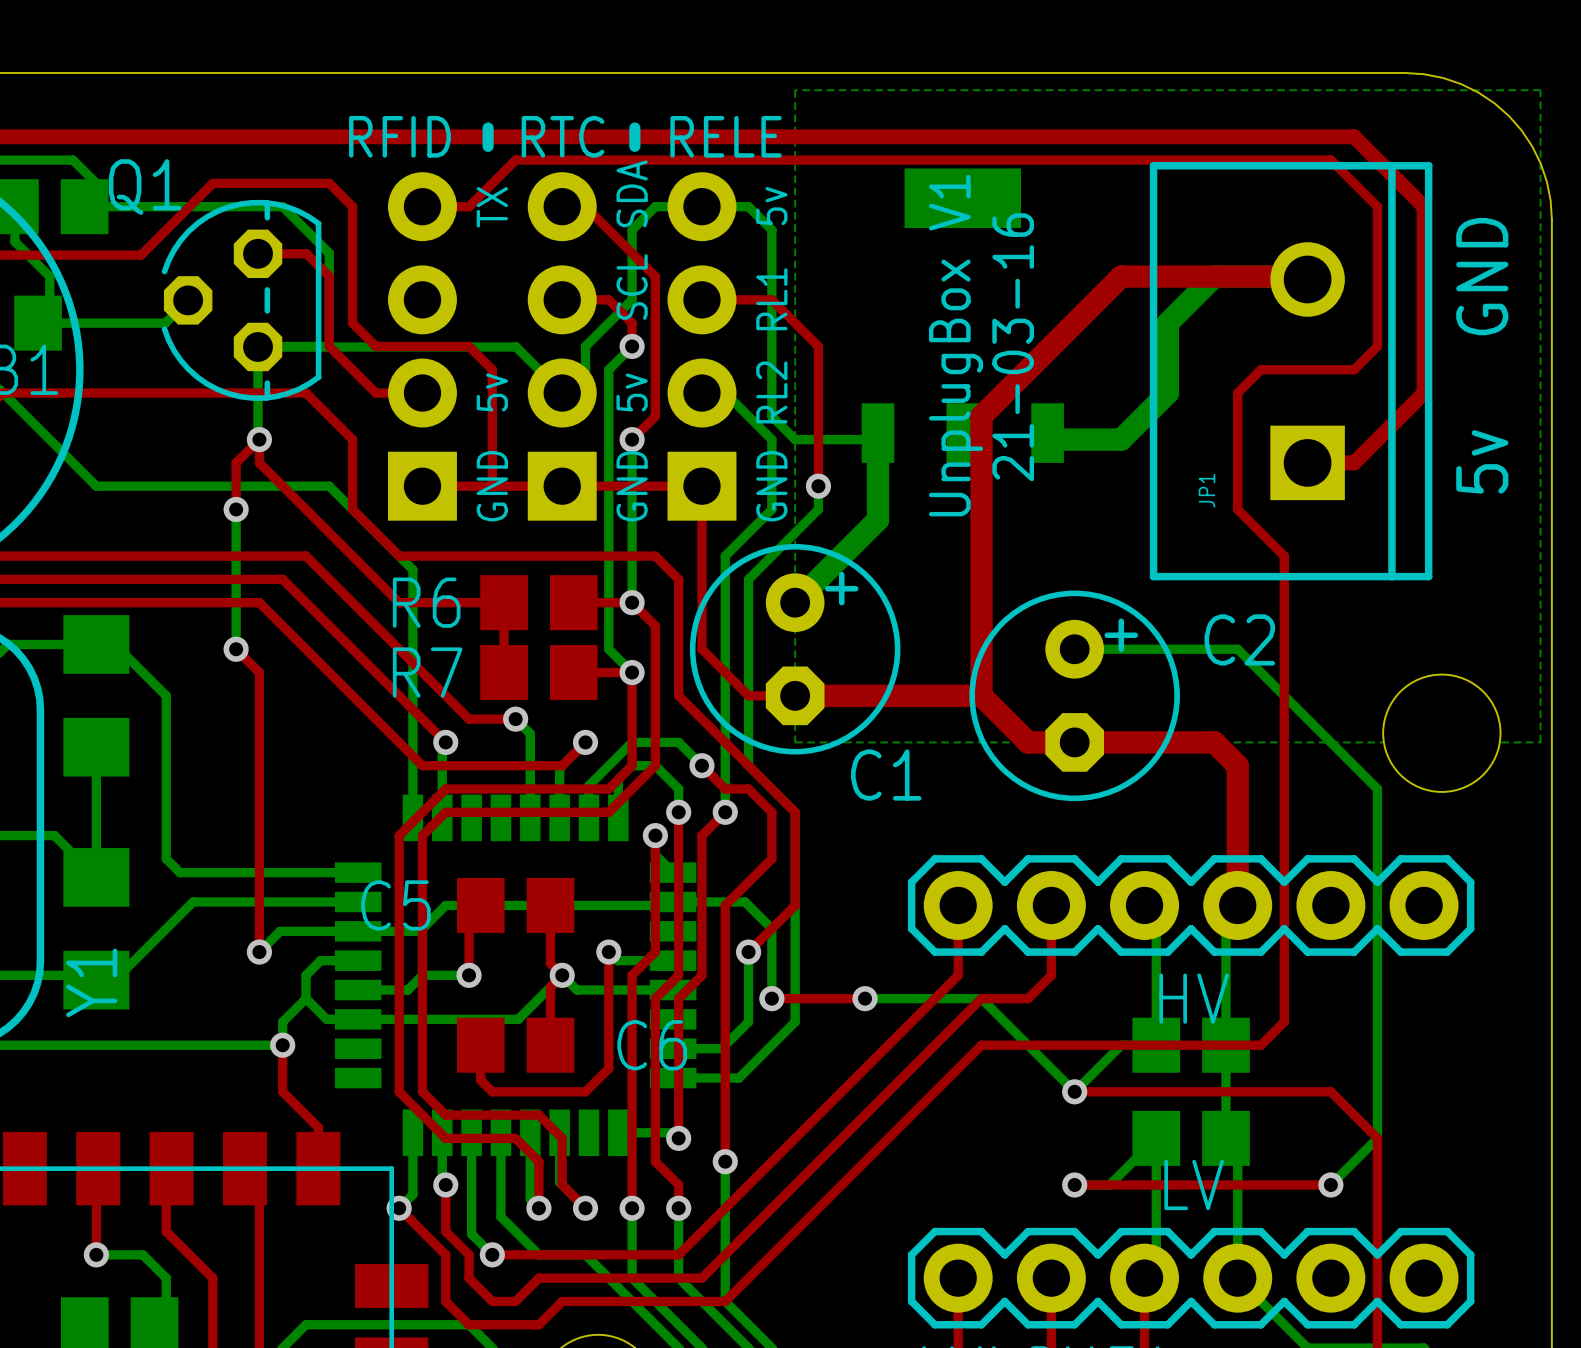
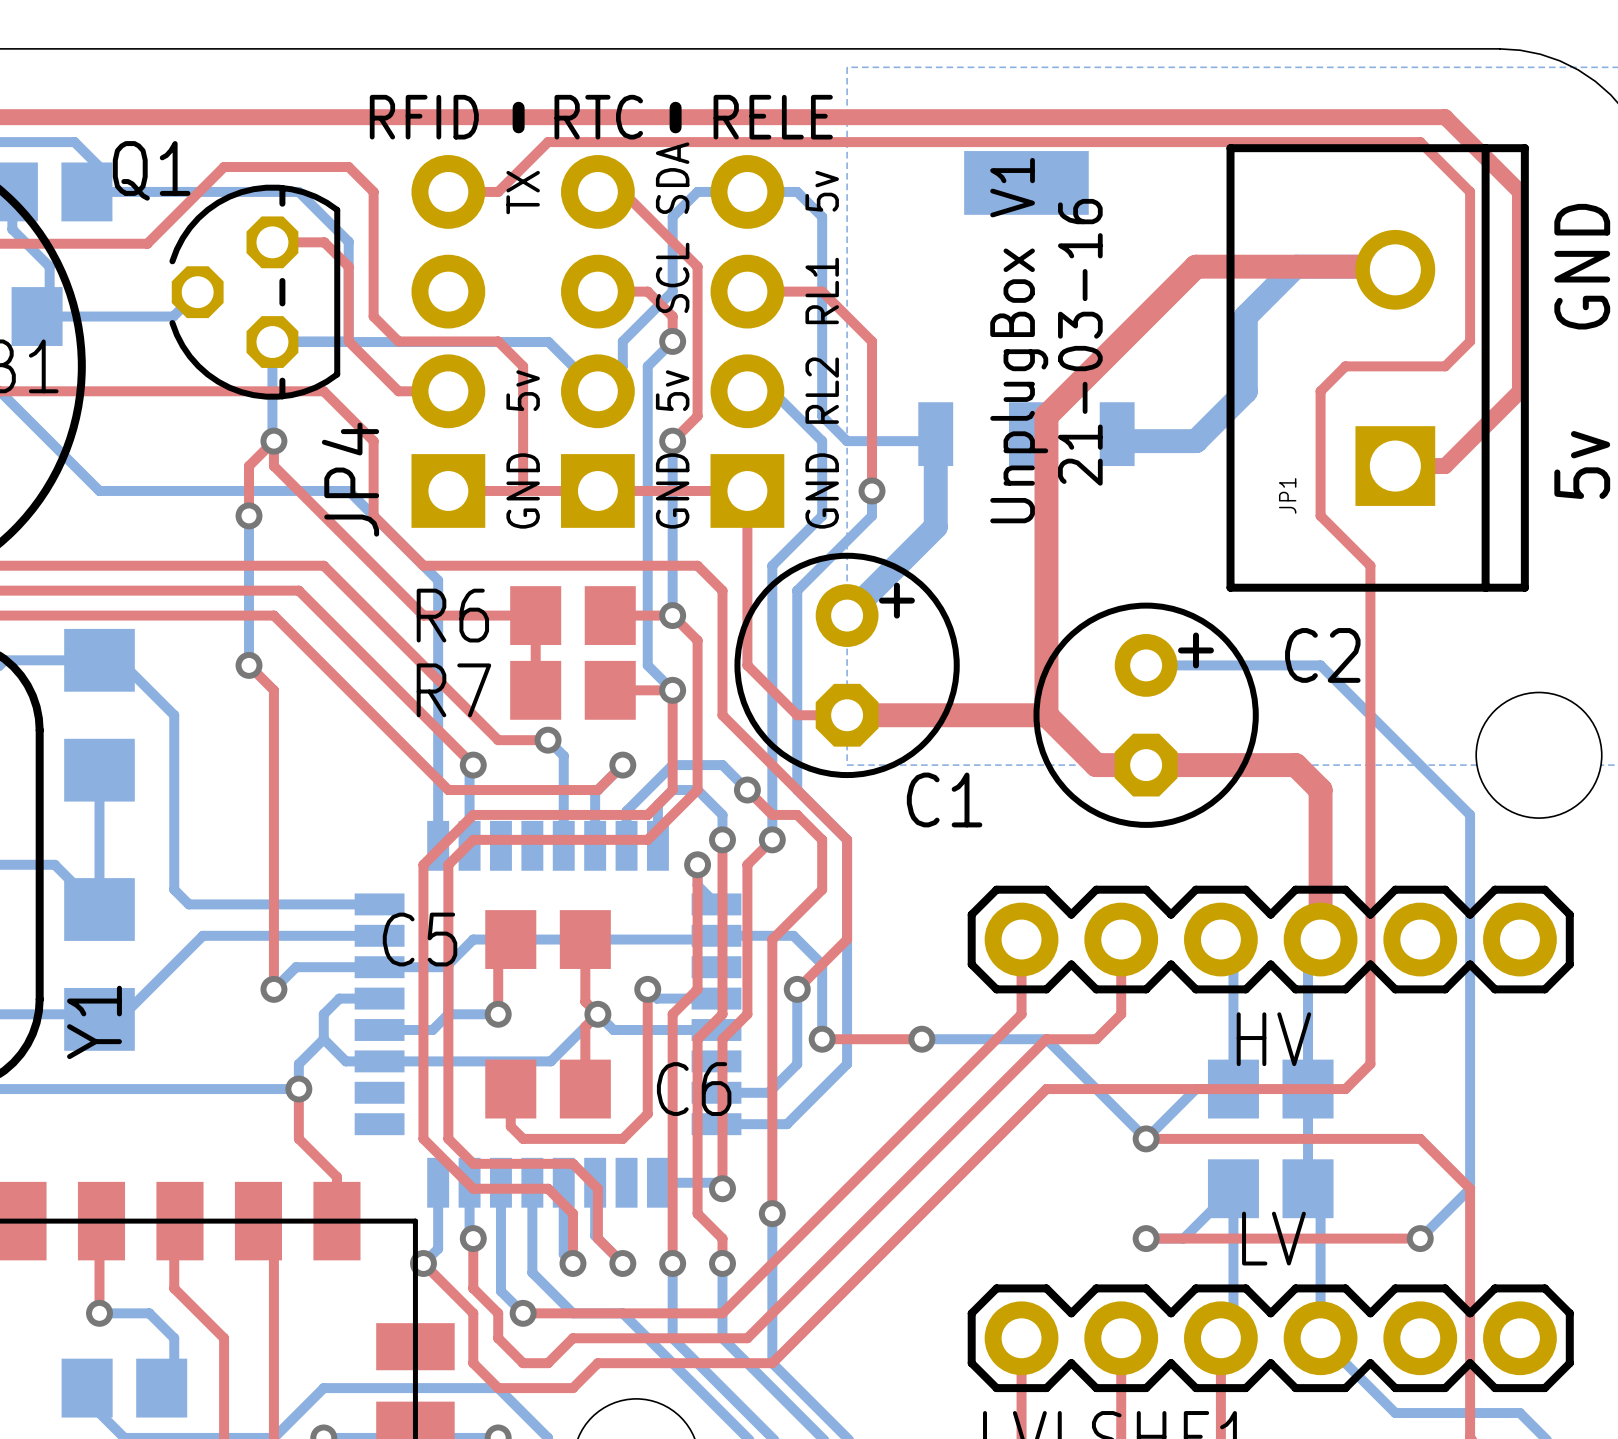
JP4 name: none -> JP4 (350, 479)

